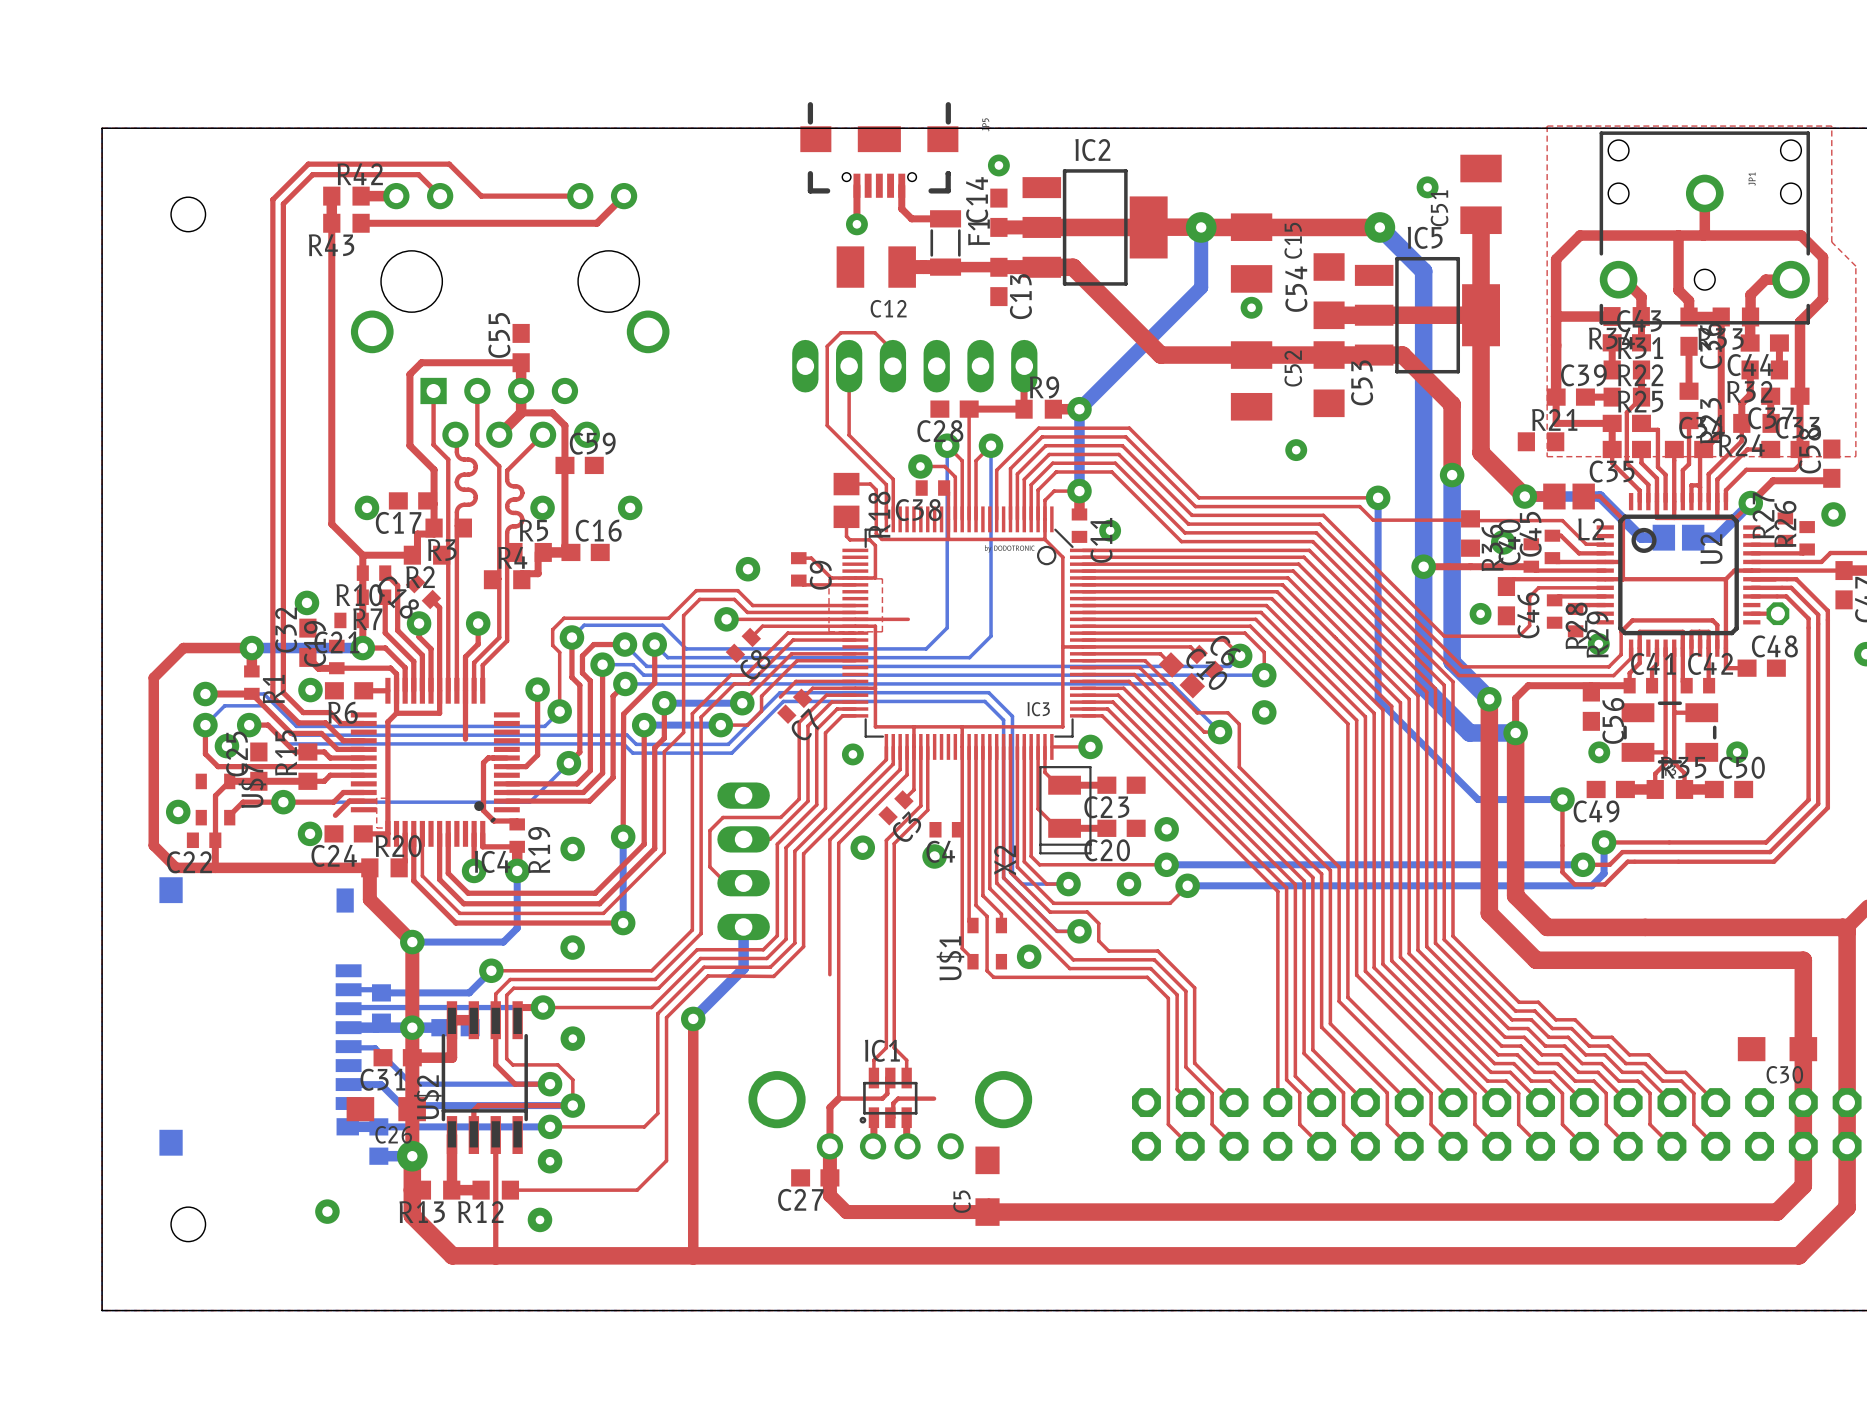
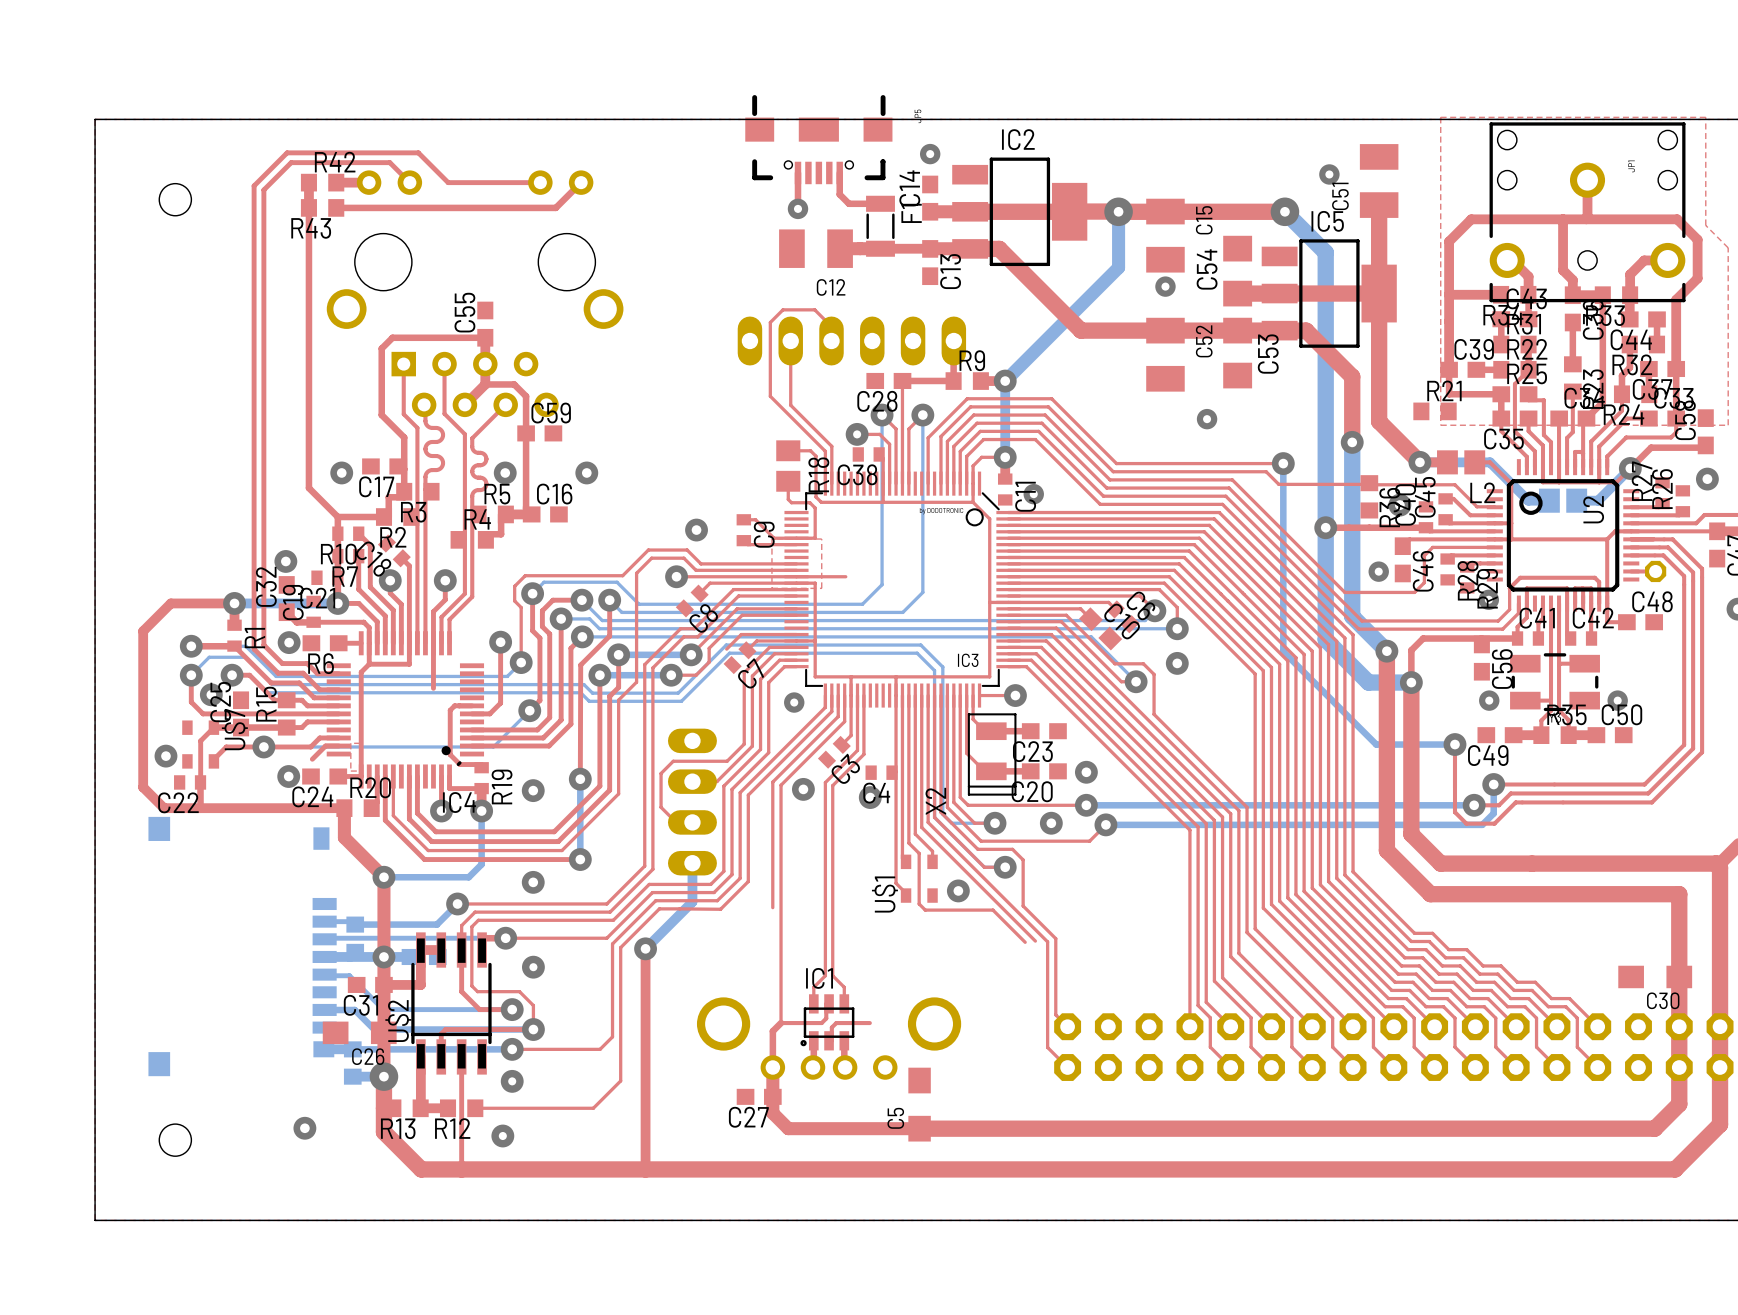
top track: (1098, 940) (1108, 951) (1157, 951) (1194, 987) (1194, 1063) (1234, 1102) -> (1023, 876) (1023, 906) (1055, 938) (1055, 1014) (1067, 1026)
top track: (1073, 959) (1154, 959) (1185, 991) (1185, 1067) (1212, 1093) (1212, 1124) (1234, 1146) -> (999, 893) (1047, 941) (1047, 1047) (1067, 1067)
top track: (1069, 968) (1150, 968) (1177, 994) (1177, 1089) (1190, 1102) -> (996, 901) (1035, 941)
top track: (1066, 977) (1147, 977) (1168, 998) (1168, 1124) (1190, 1146) -> (992, 910) (1025, 942)

